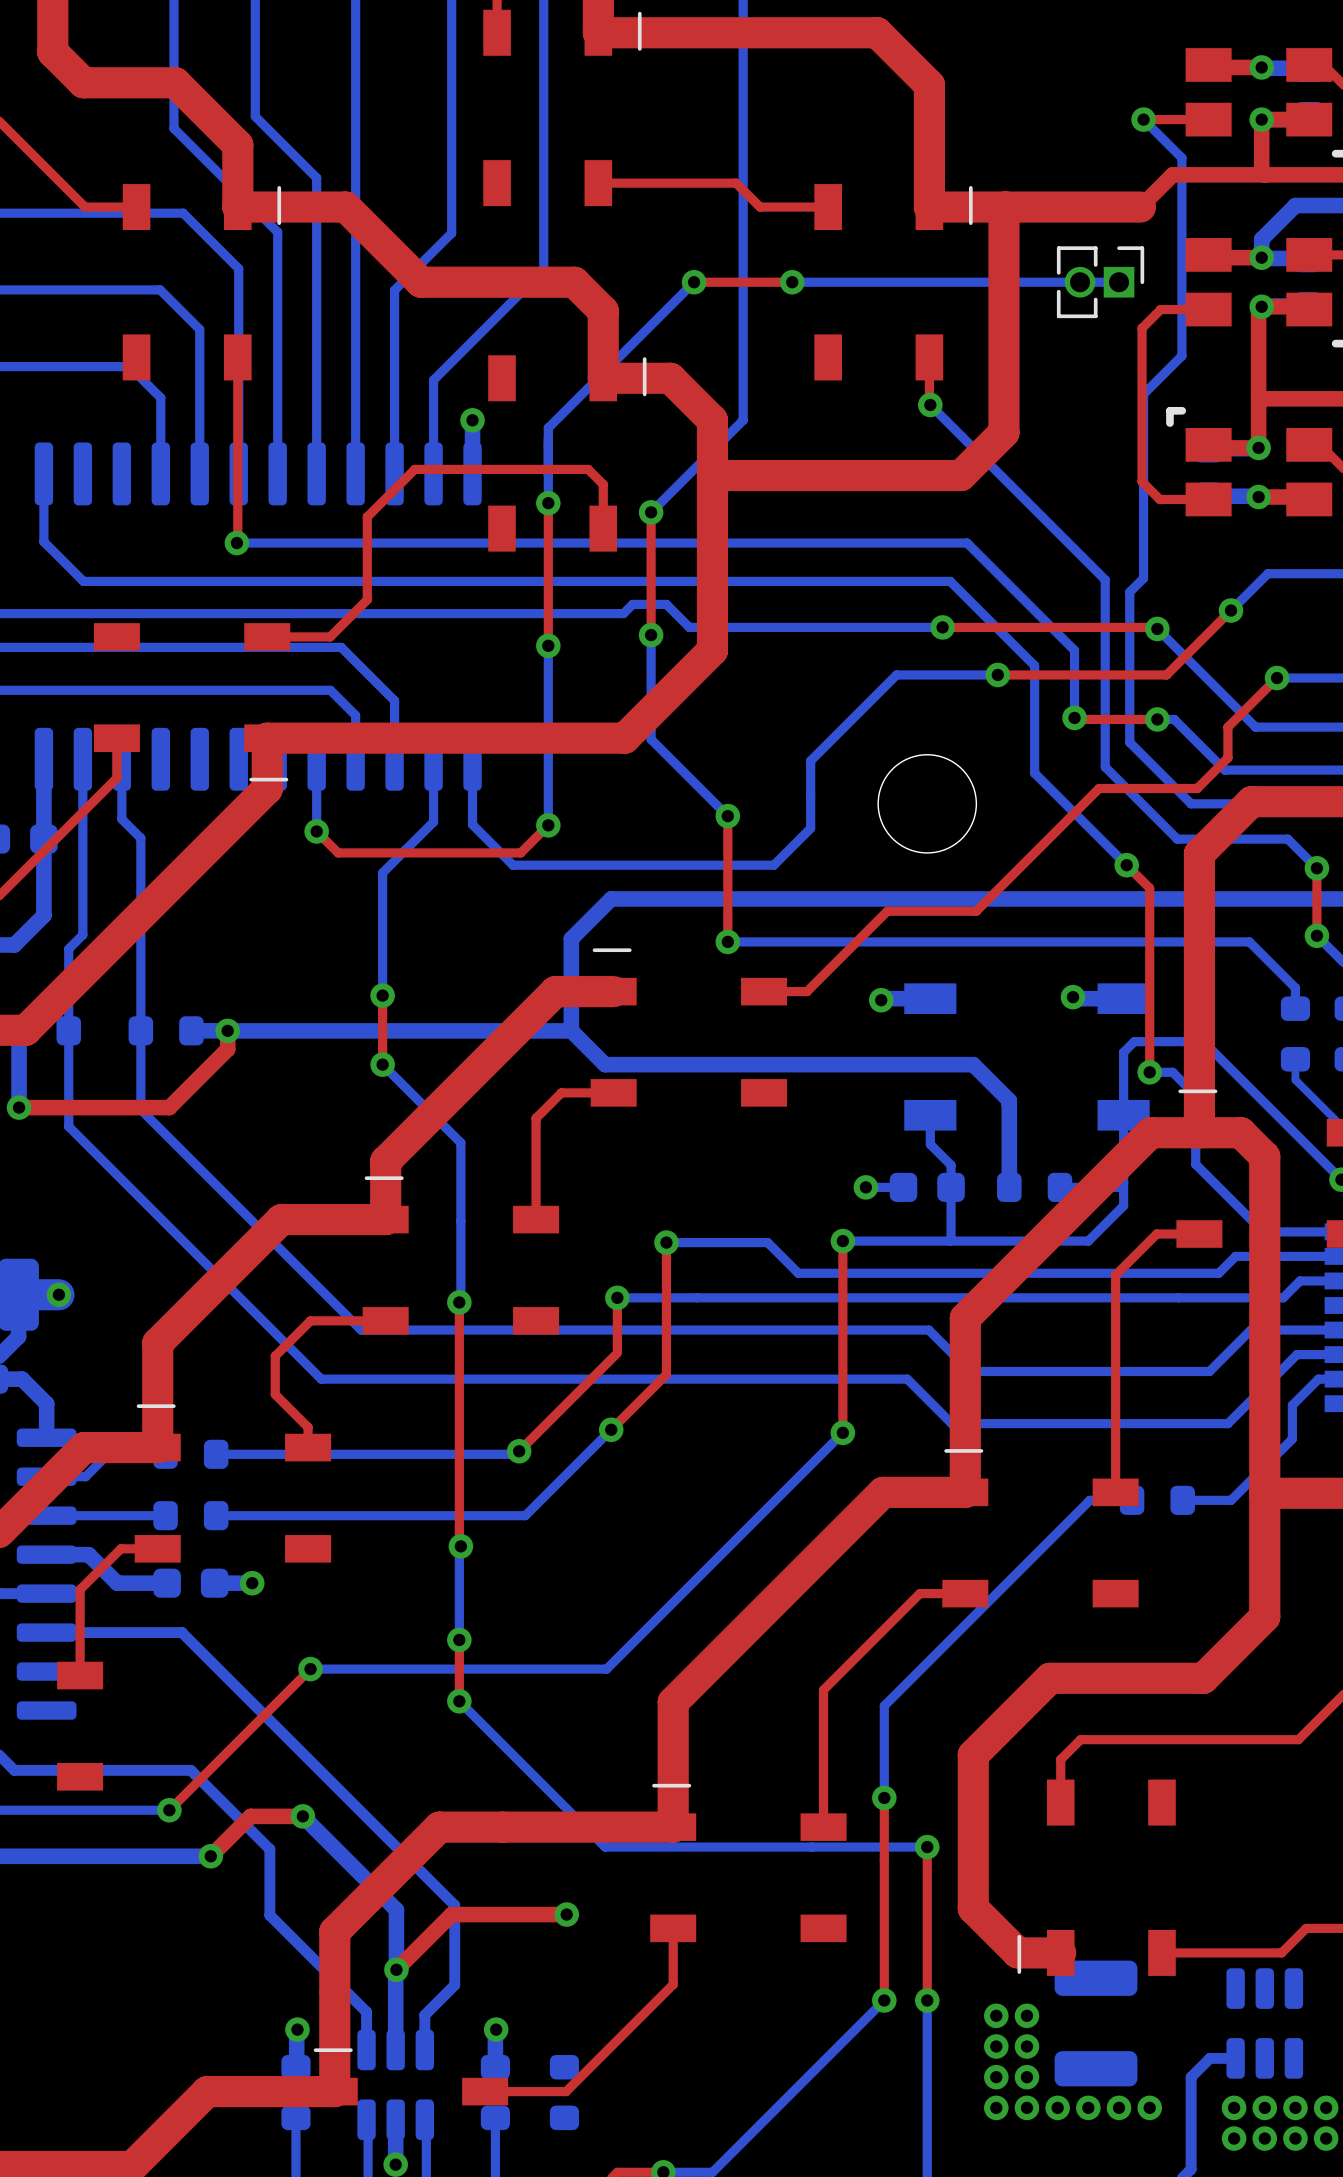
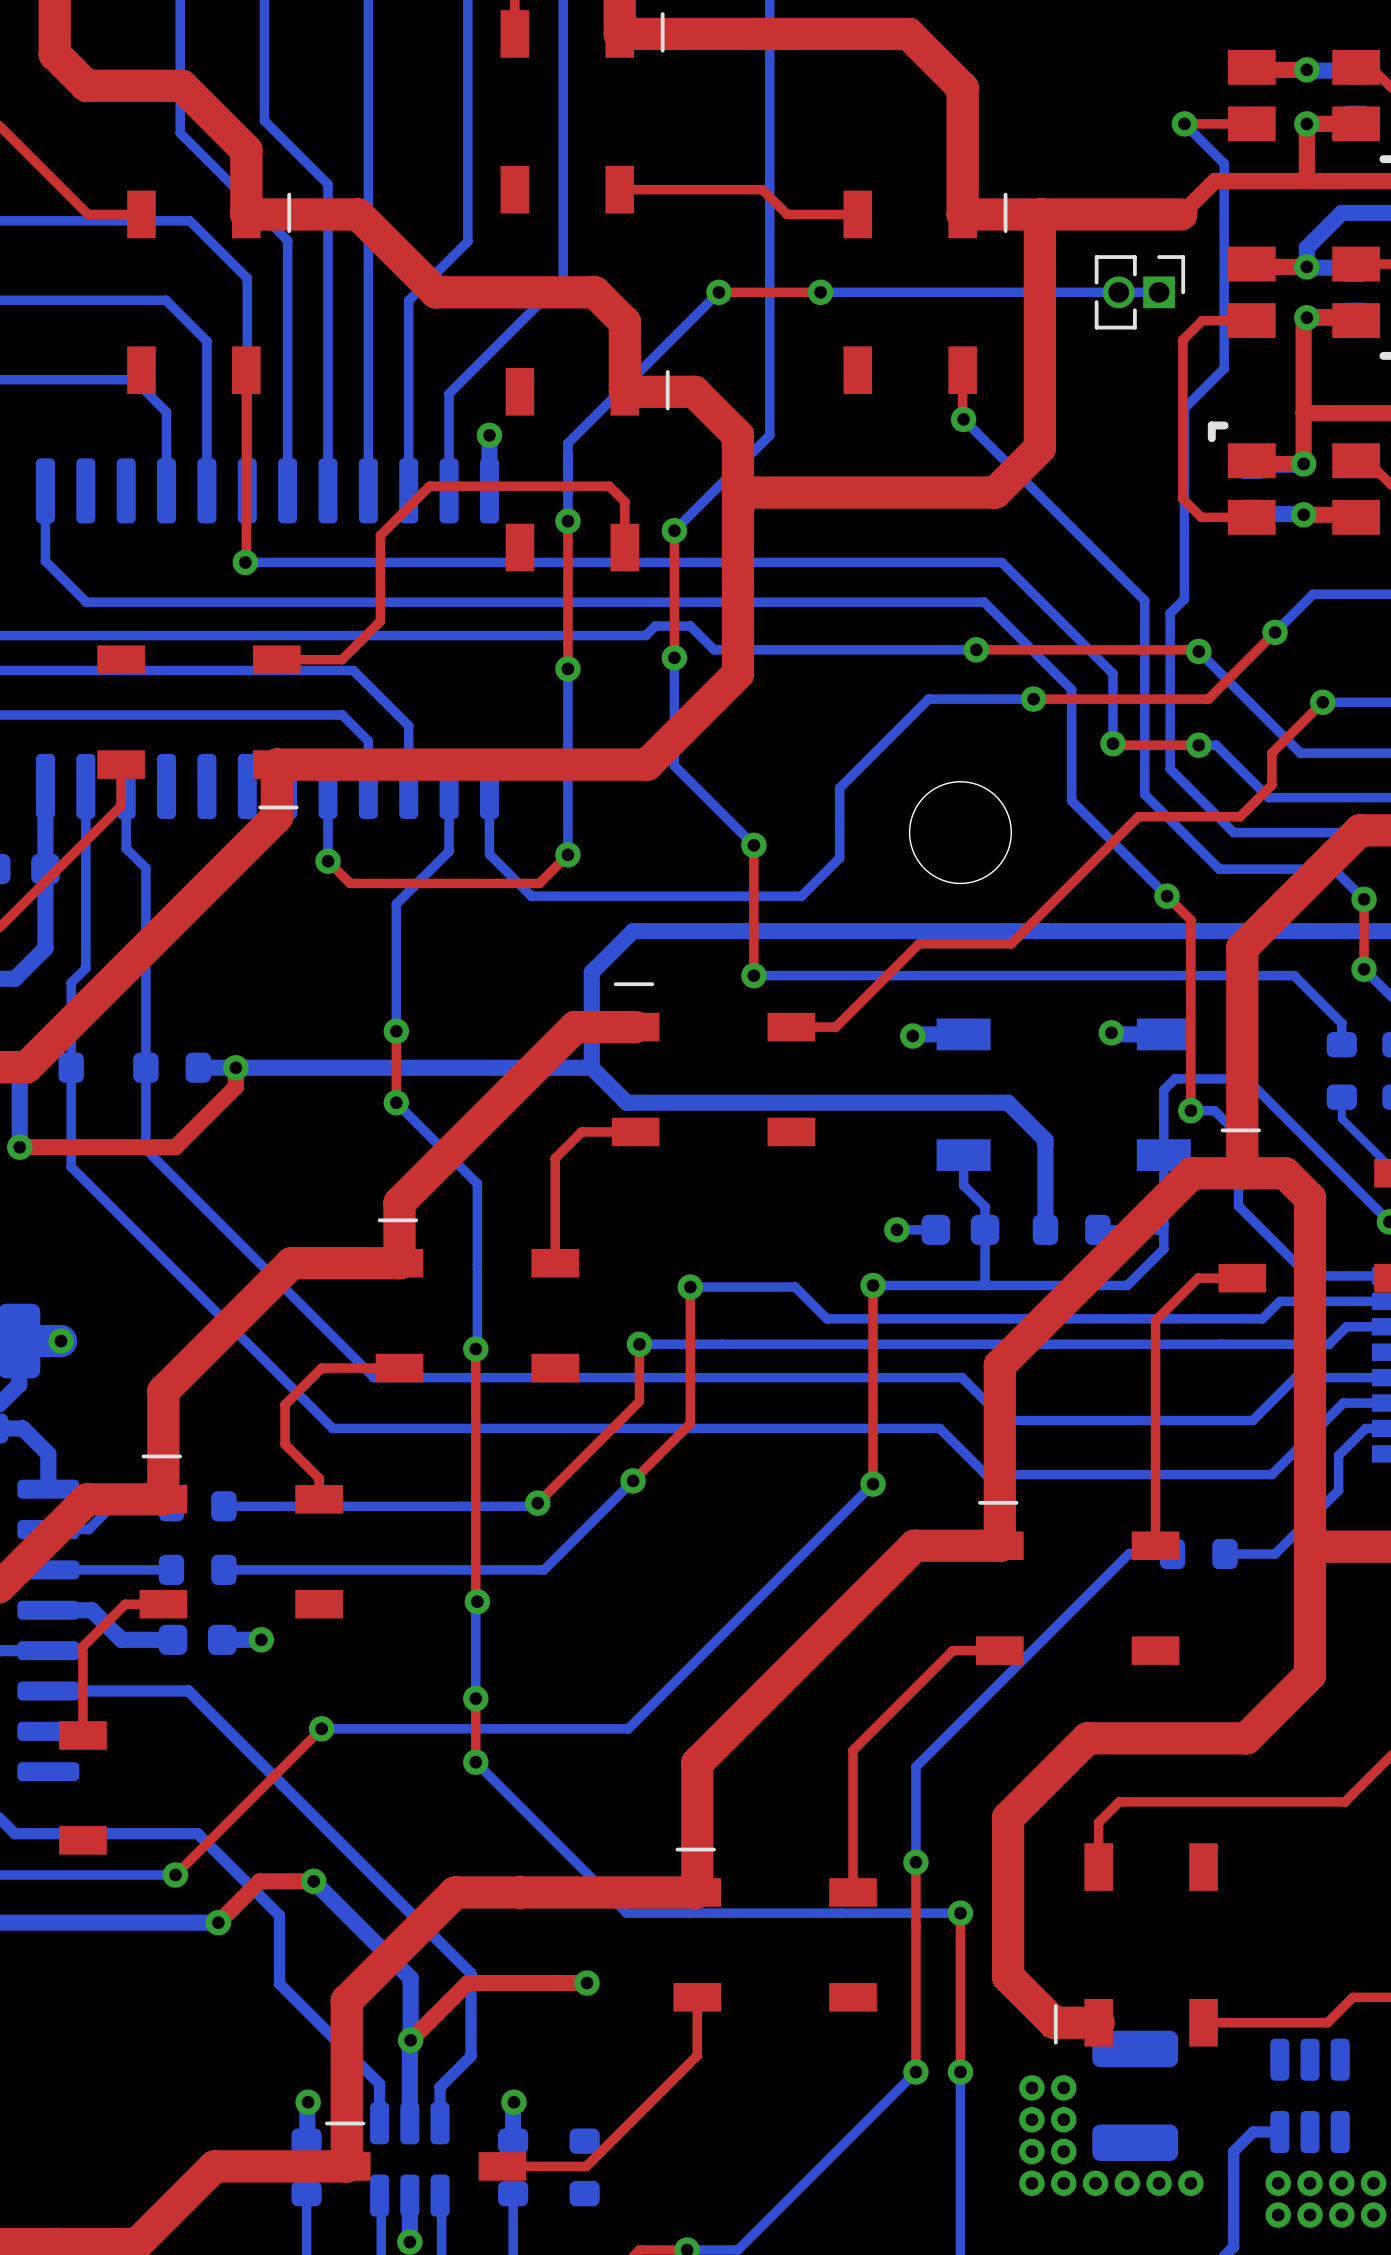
top track: (1312, 801) (1251, 801) (1199, 853) (1199, 915) -> (1359, 830) (1242, 947)

